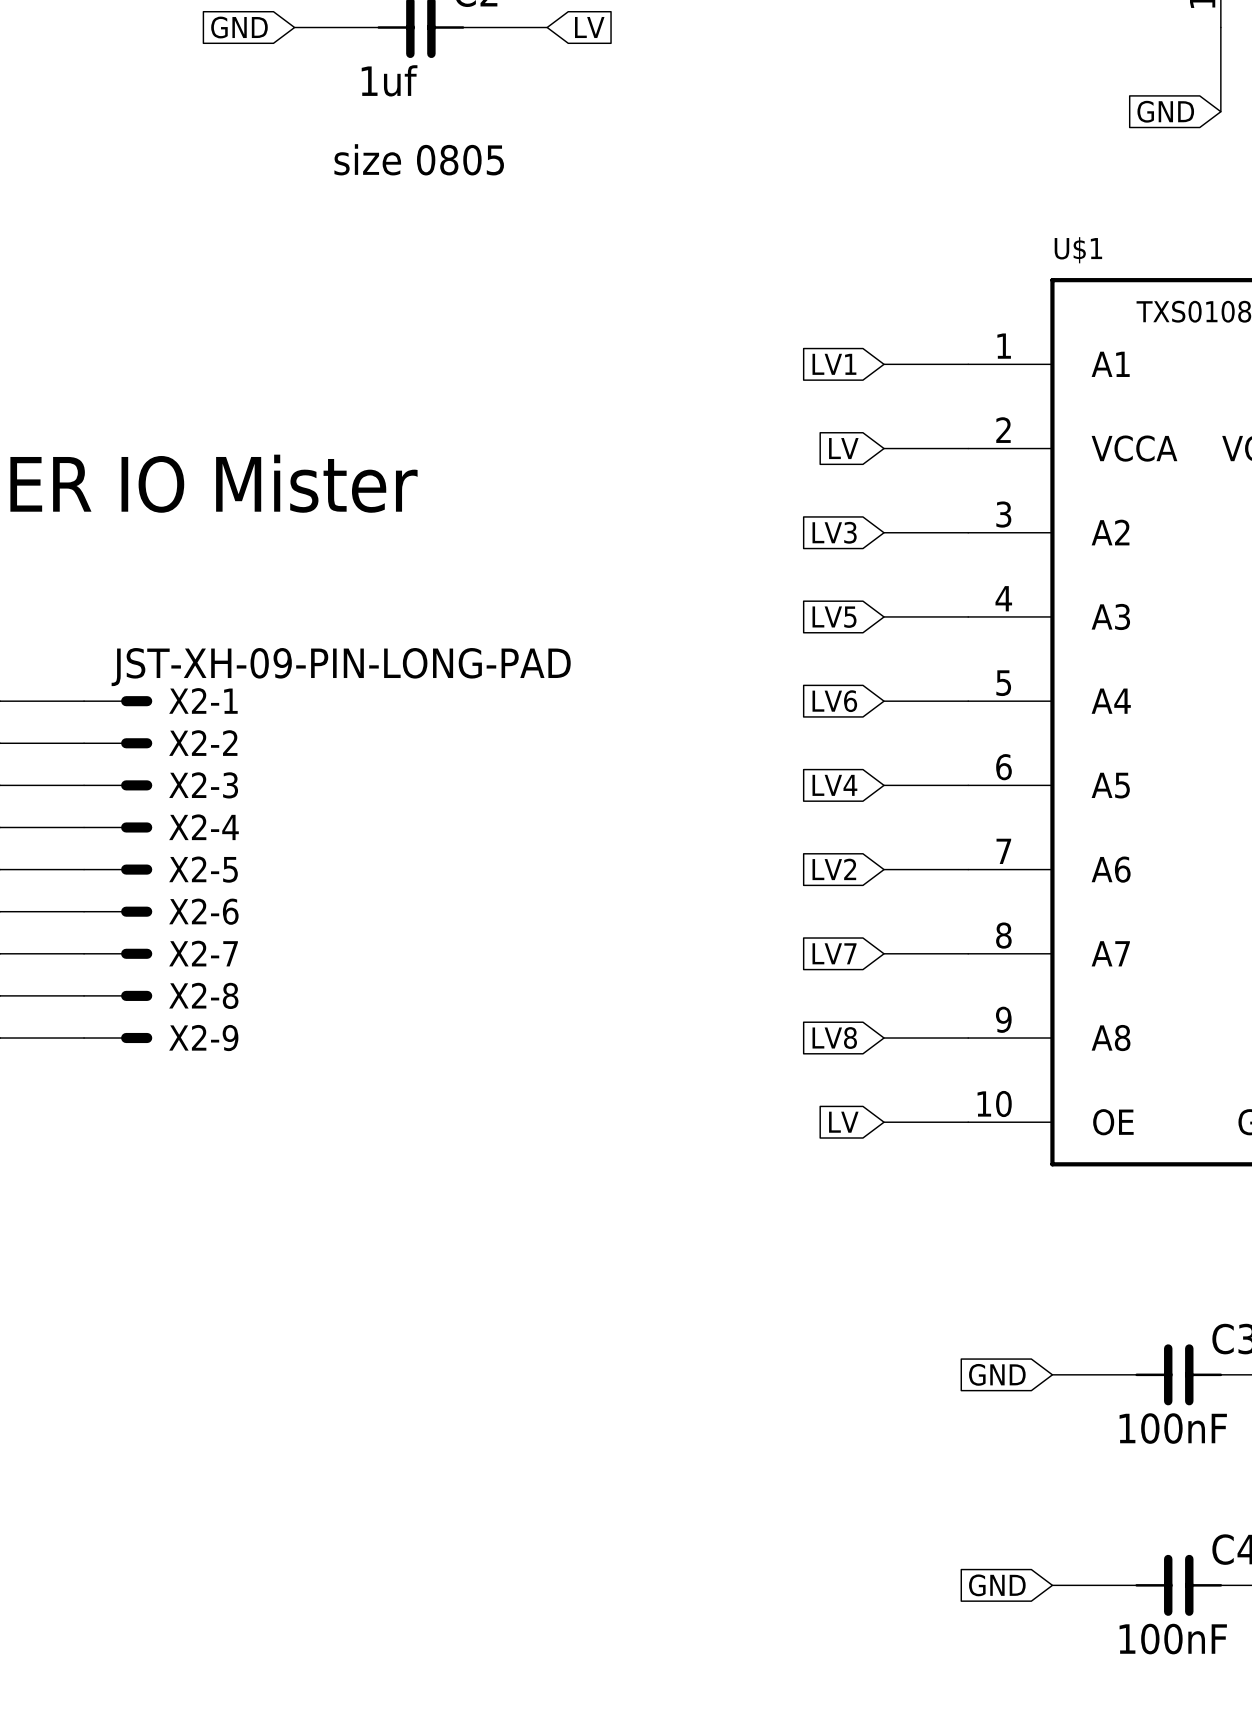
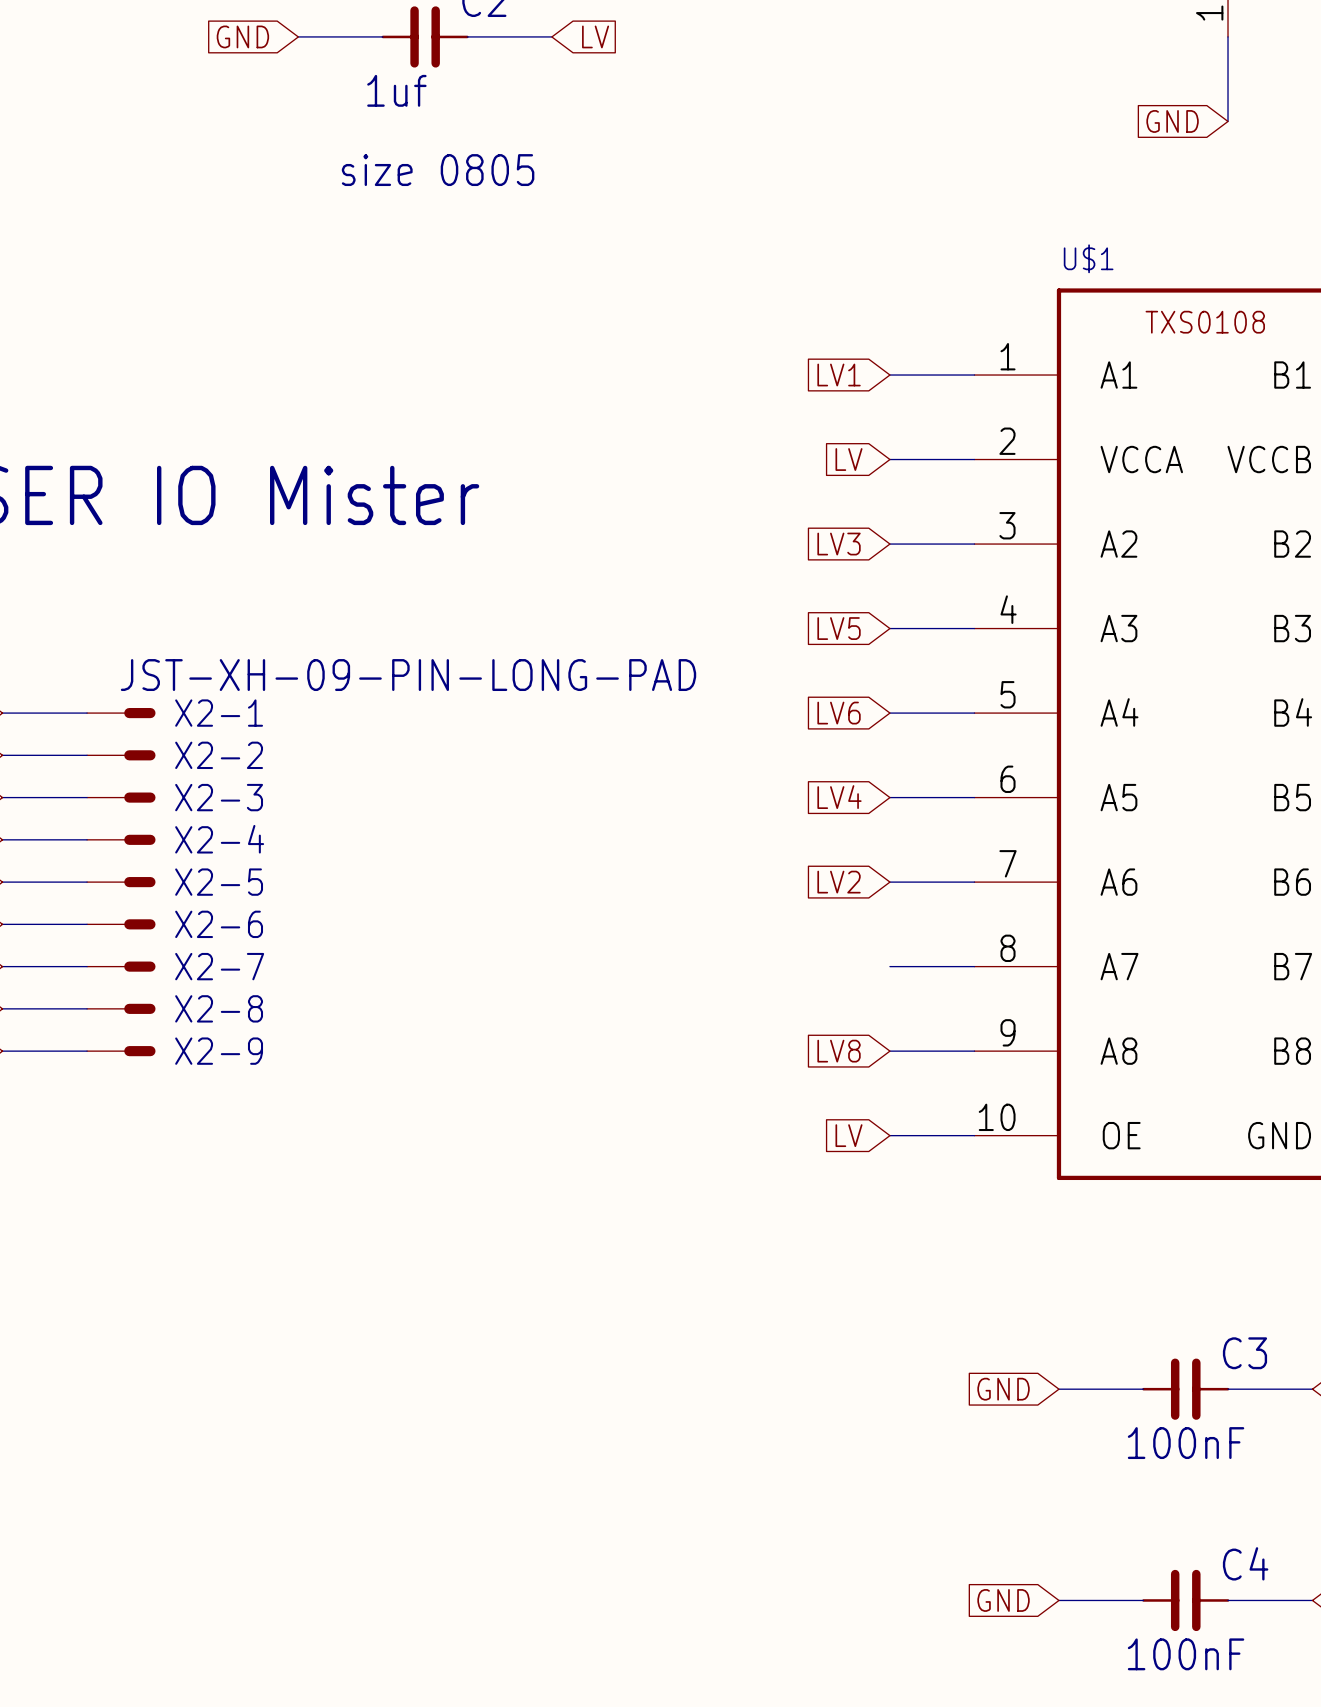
global label: LV7 (834, 953) -> none

